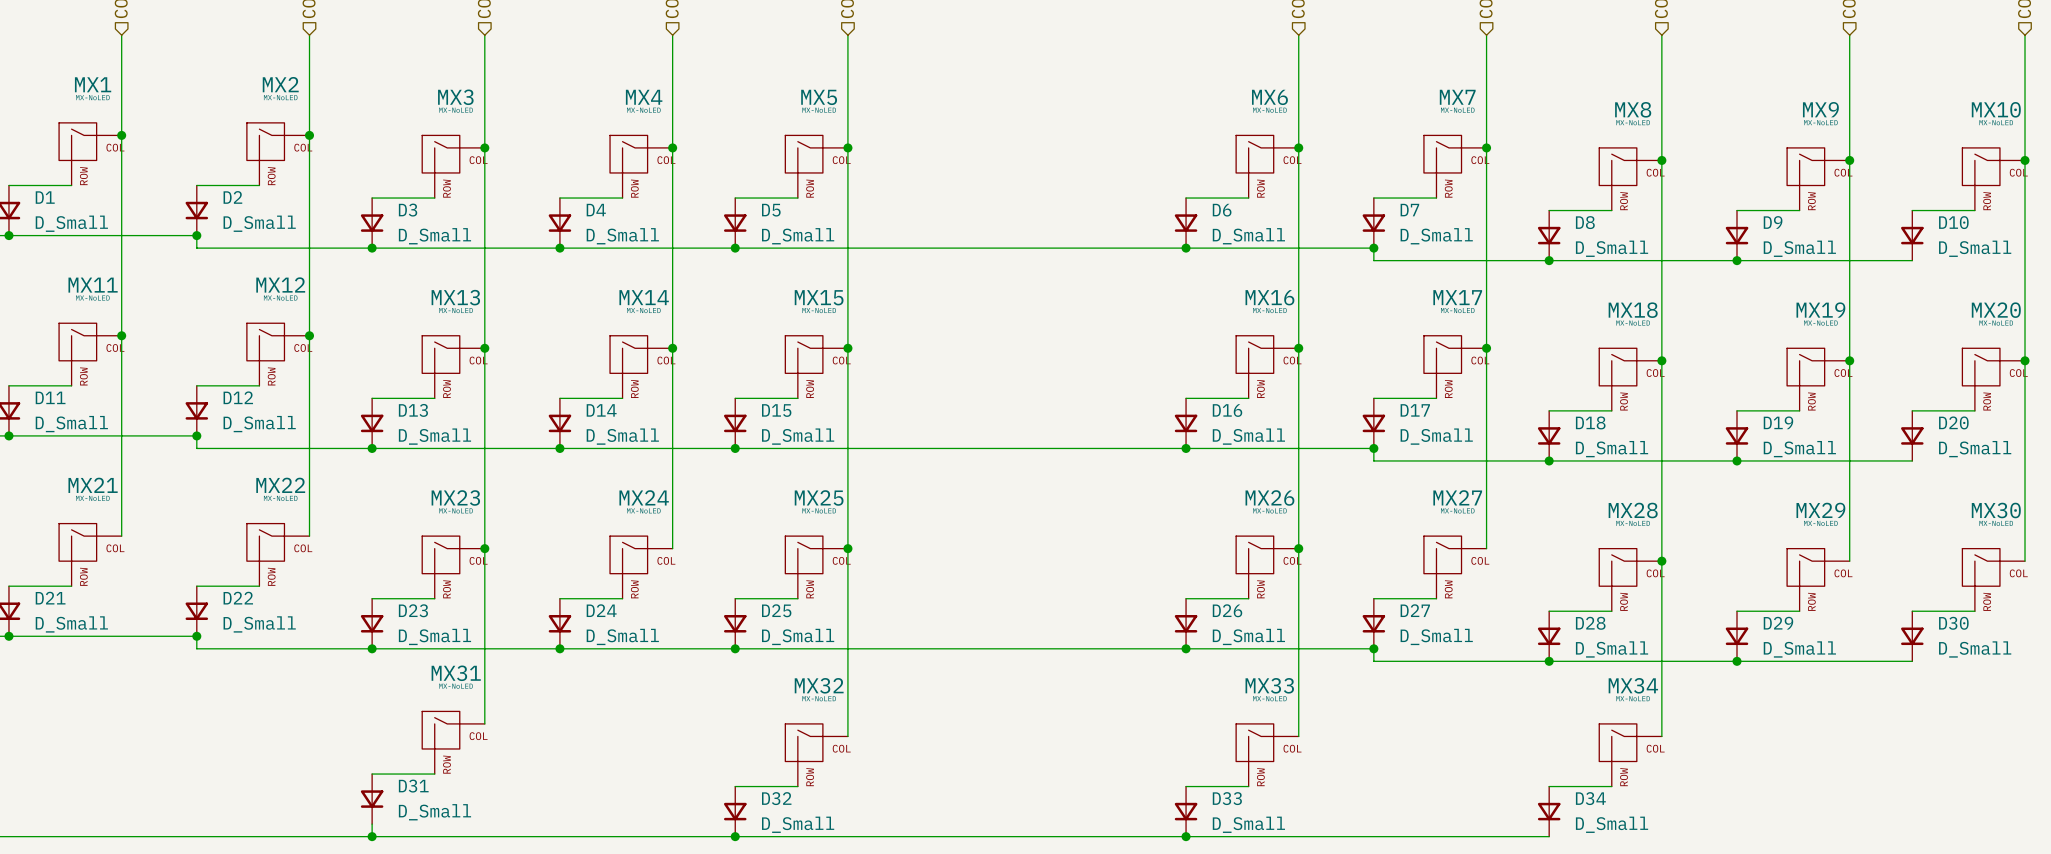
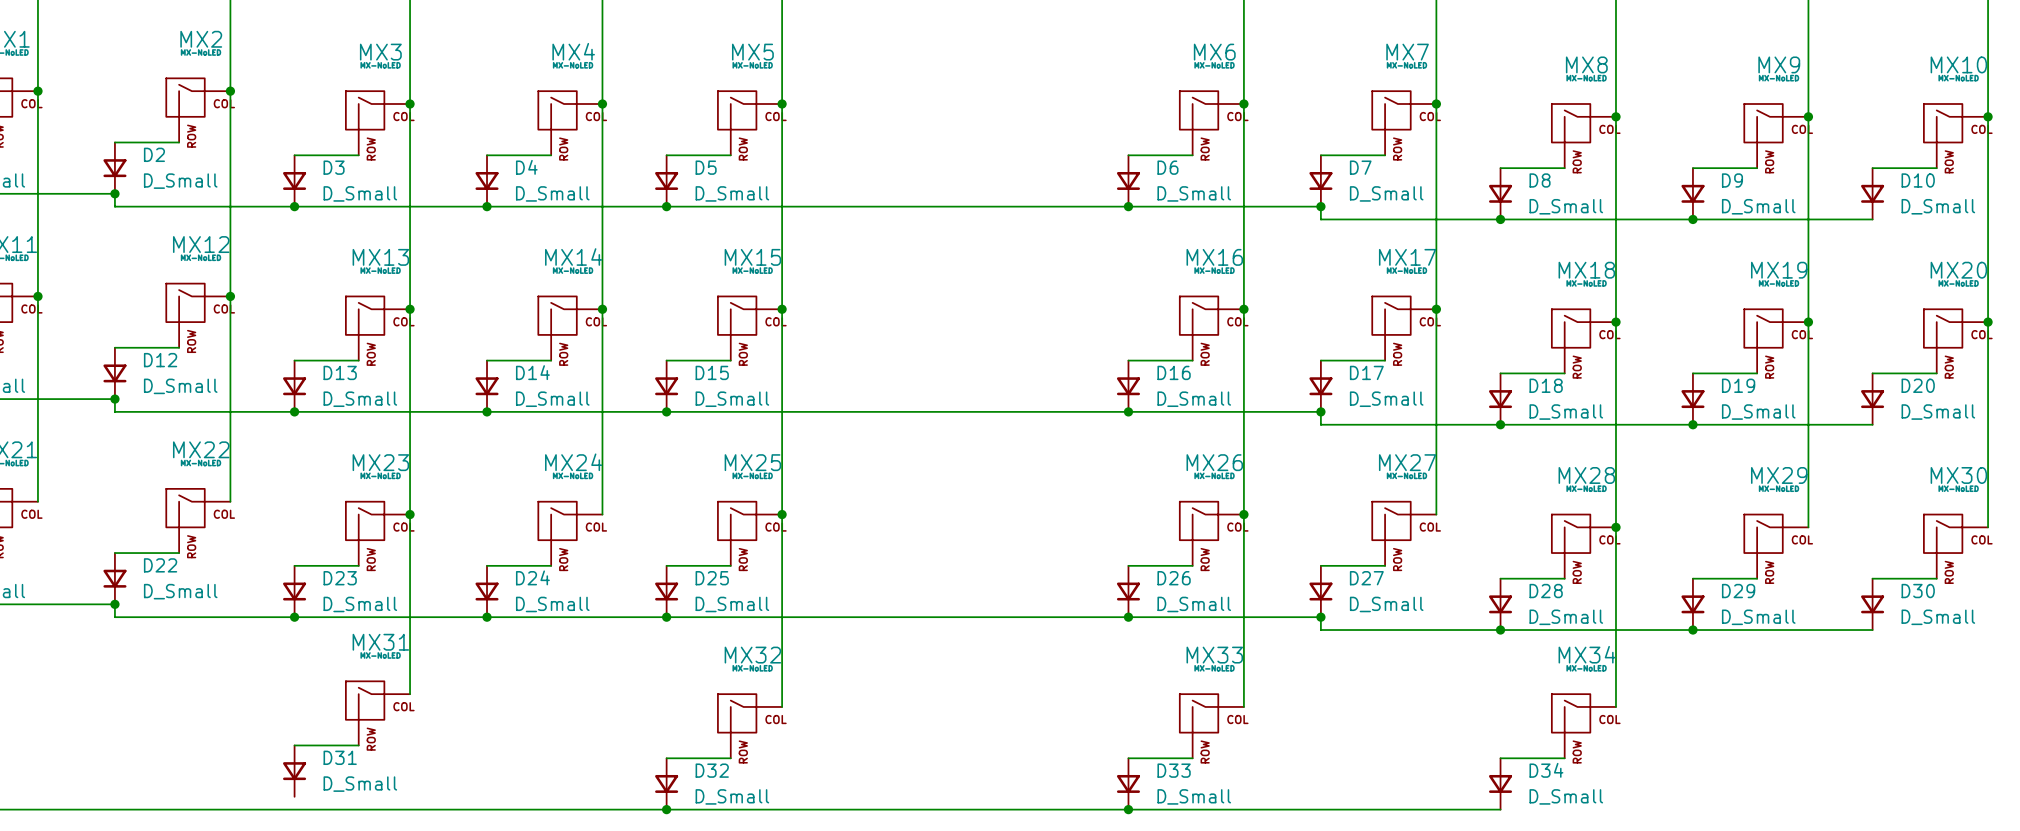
wire: (372, 824) (372, 836) -> none
junction: (372, 836) -> none

